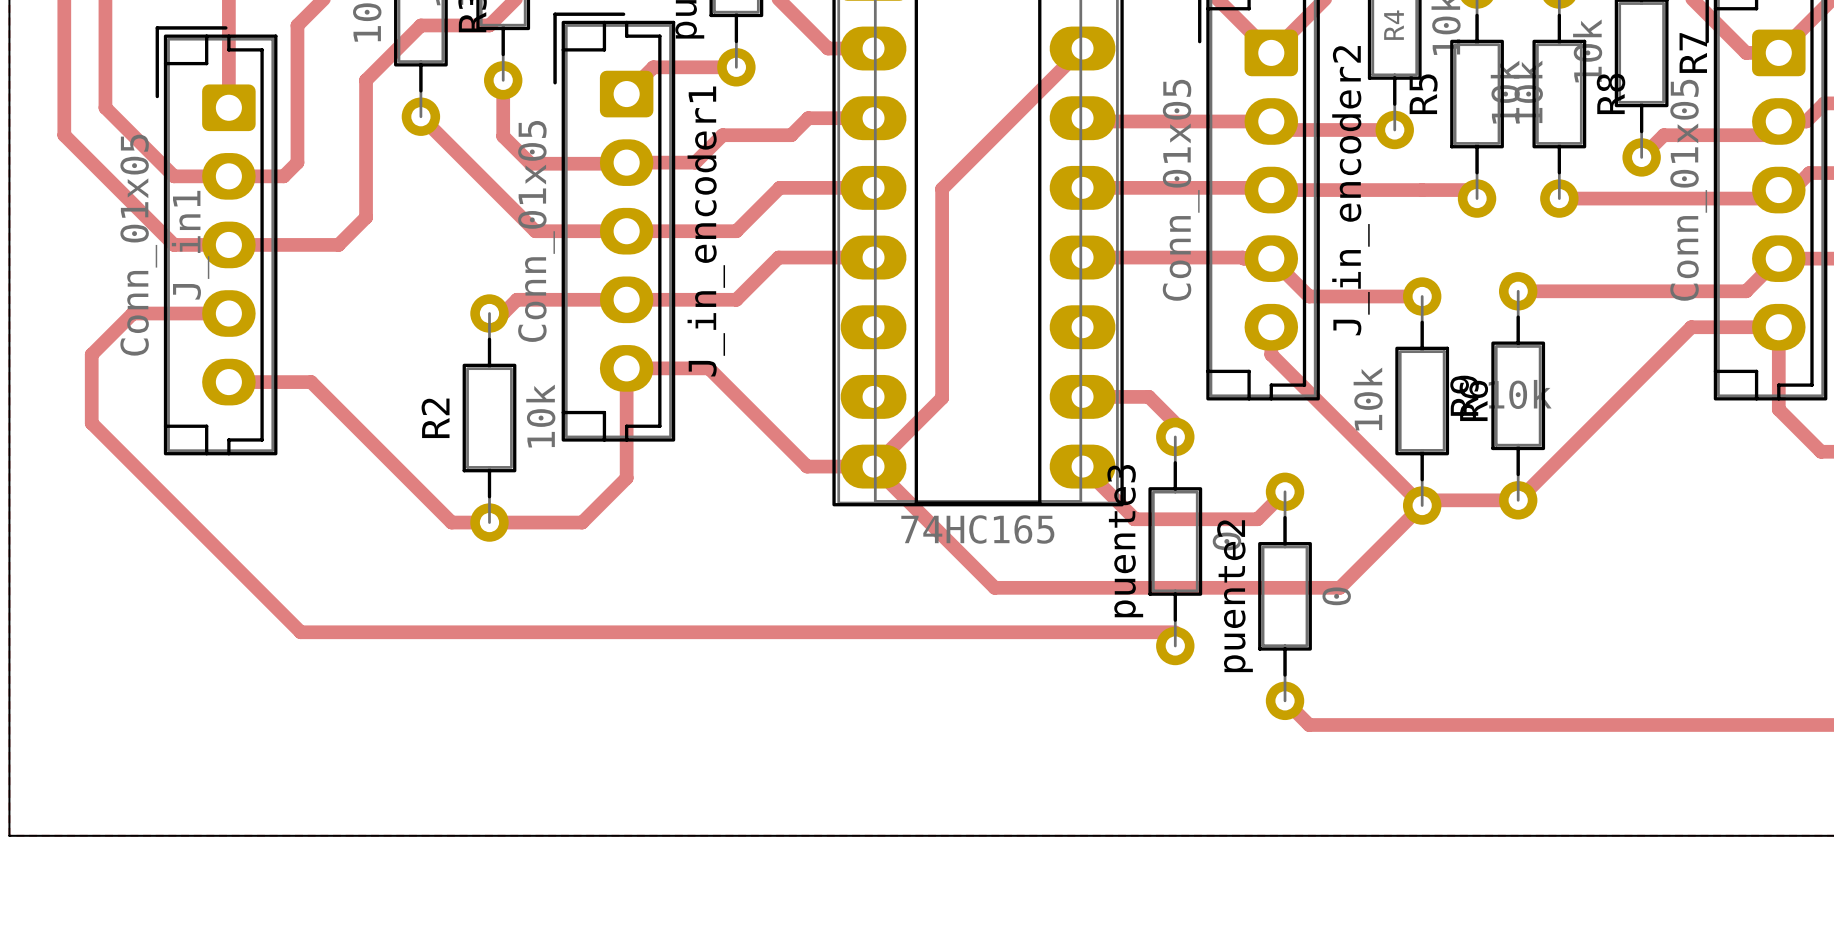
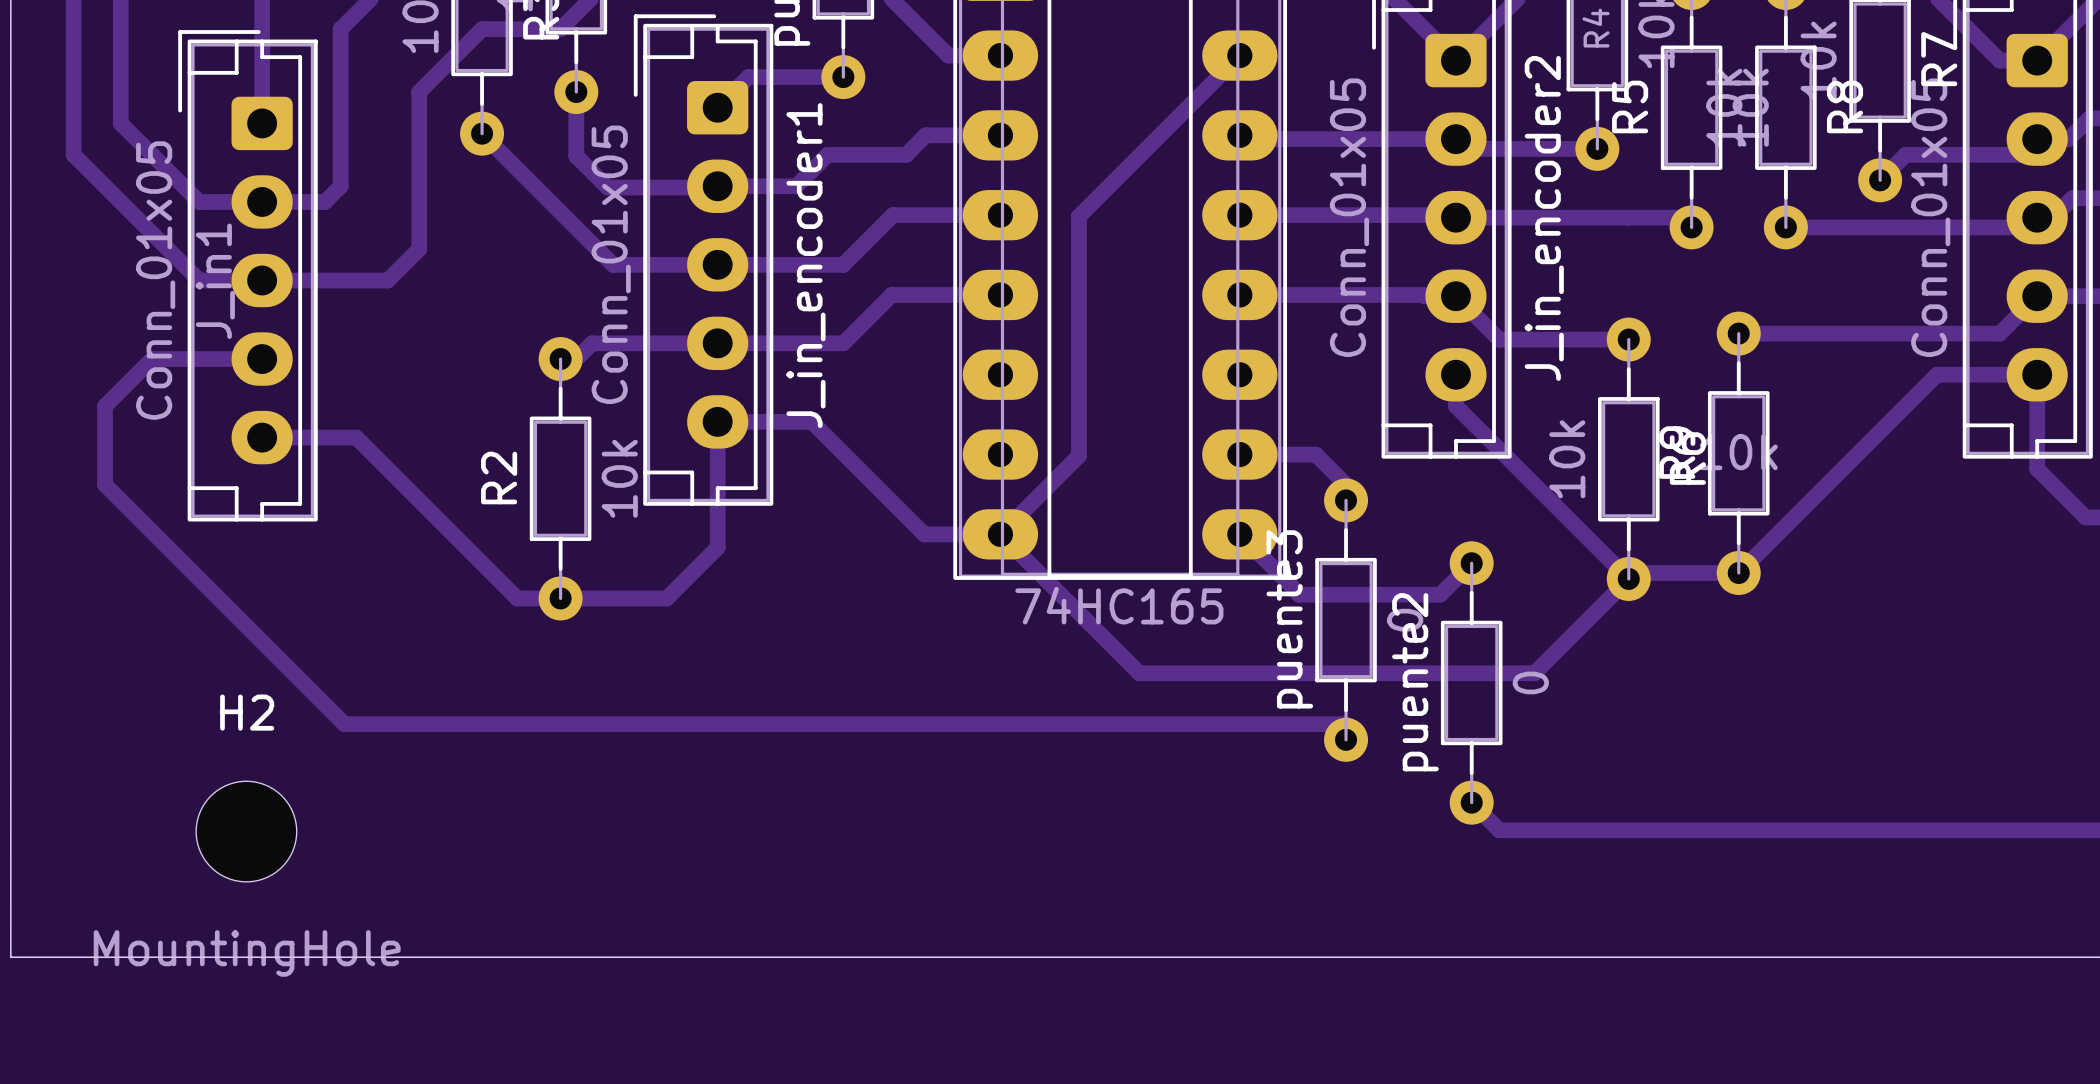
H2: none -> MountingHole (246, 831)

